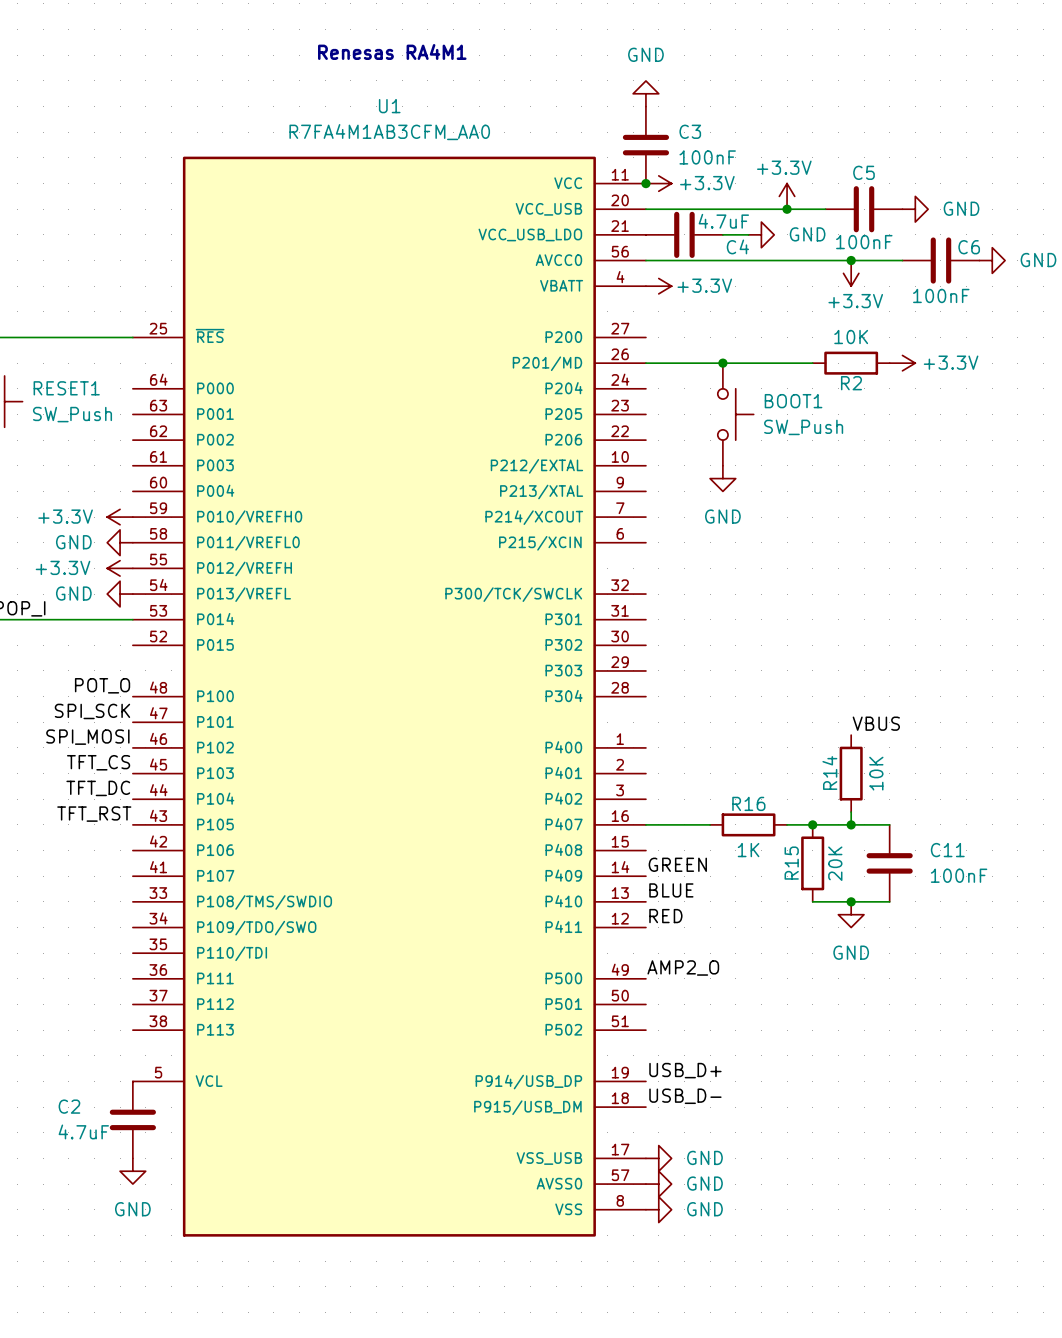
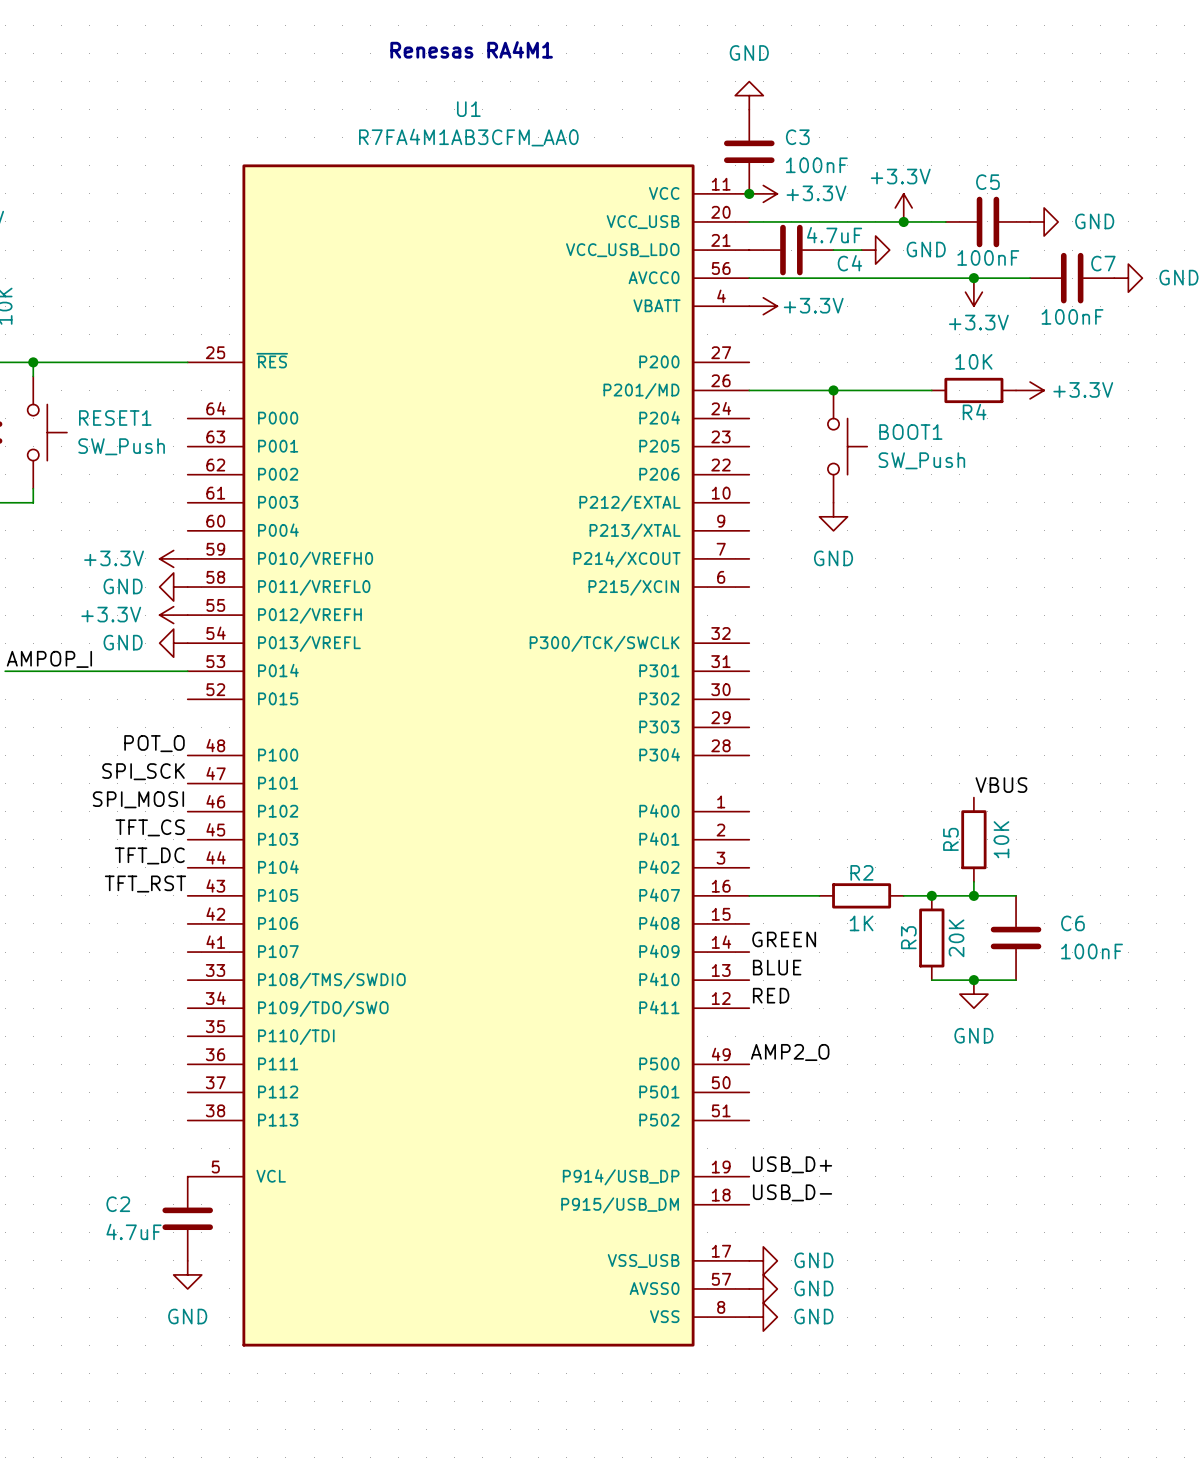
C6 name: C6 (969, 247) -> C7 (1103, 263)
R2 name: R2 (851, 383) -> R4 (974, 412)
R14 name: R14 (829, 772) -> R5 (950, 839)
R16 name: R16 (748, 803) -> R2 (861, 872)
C11 name: C11 (947, 850) -> C6 (1072, 923)
R15 name: R15 (791, 863) -> R3 (908, 937)

